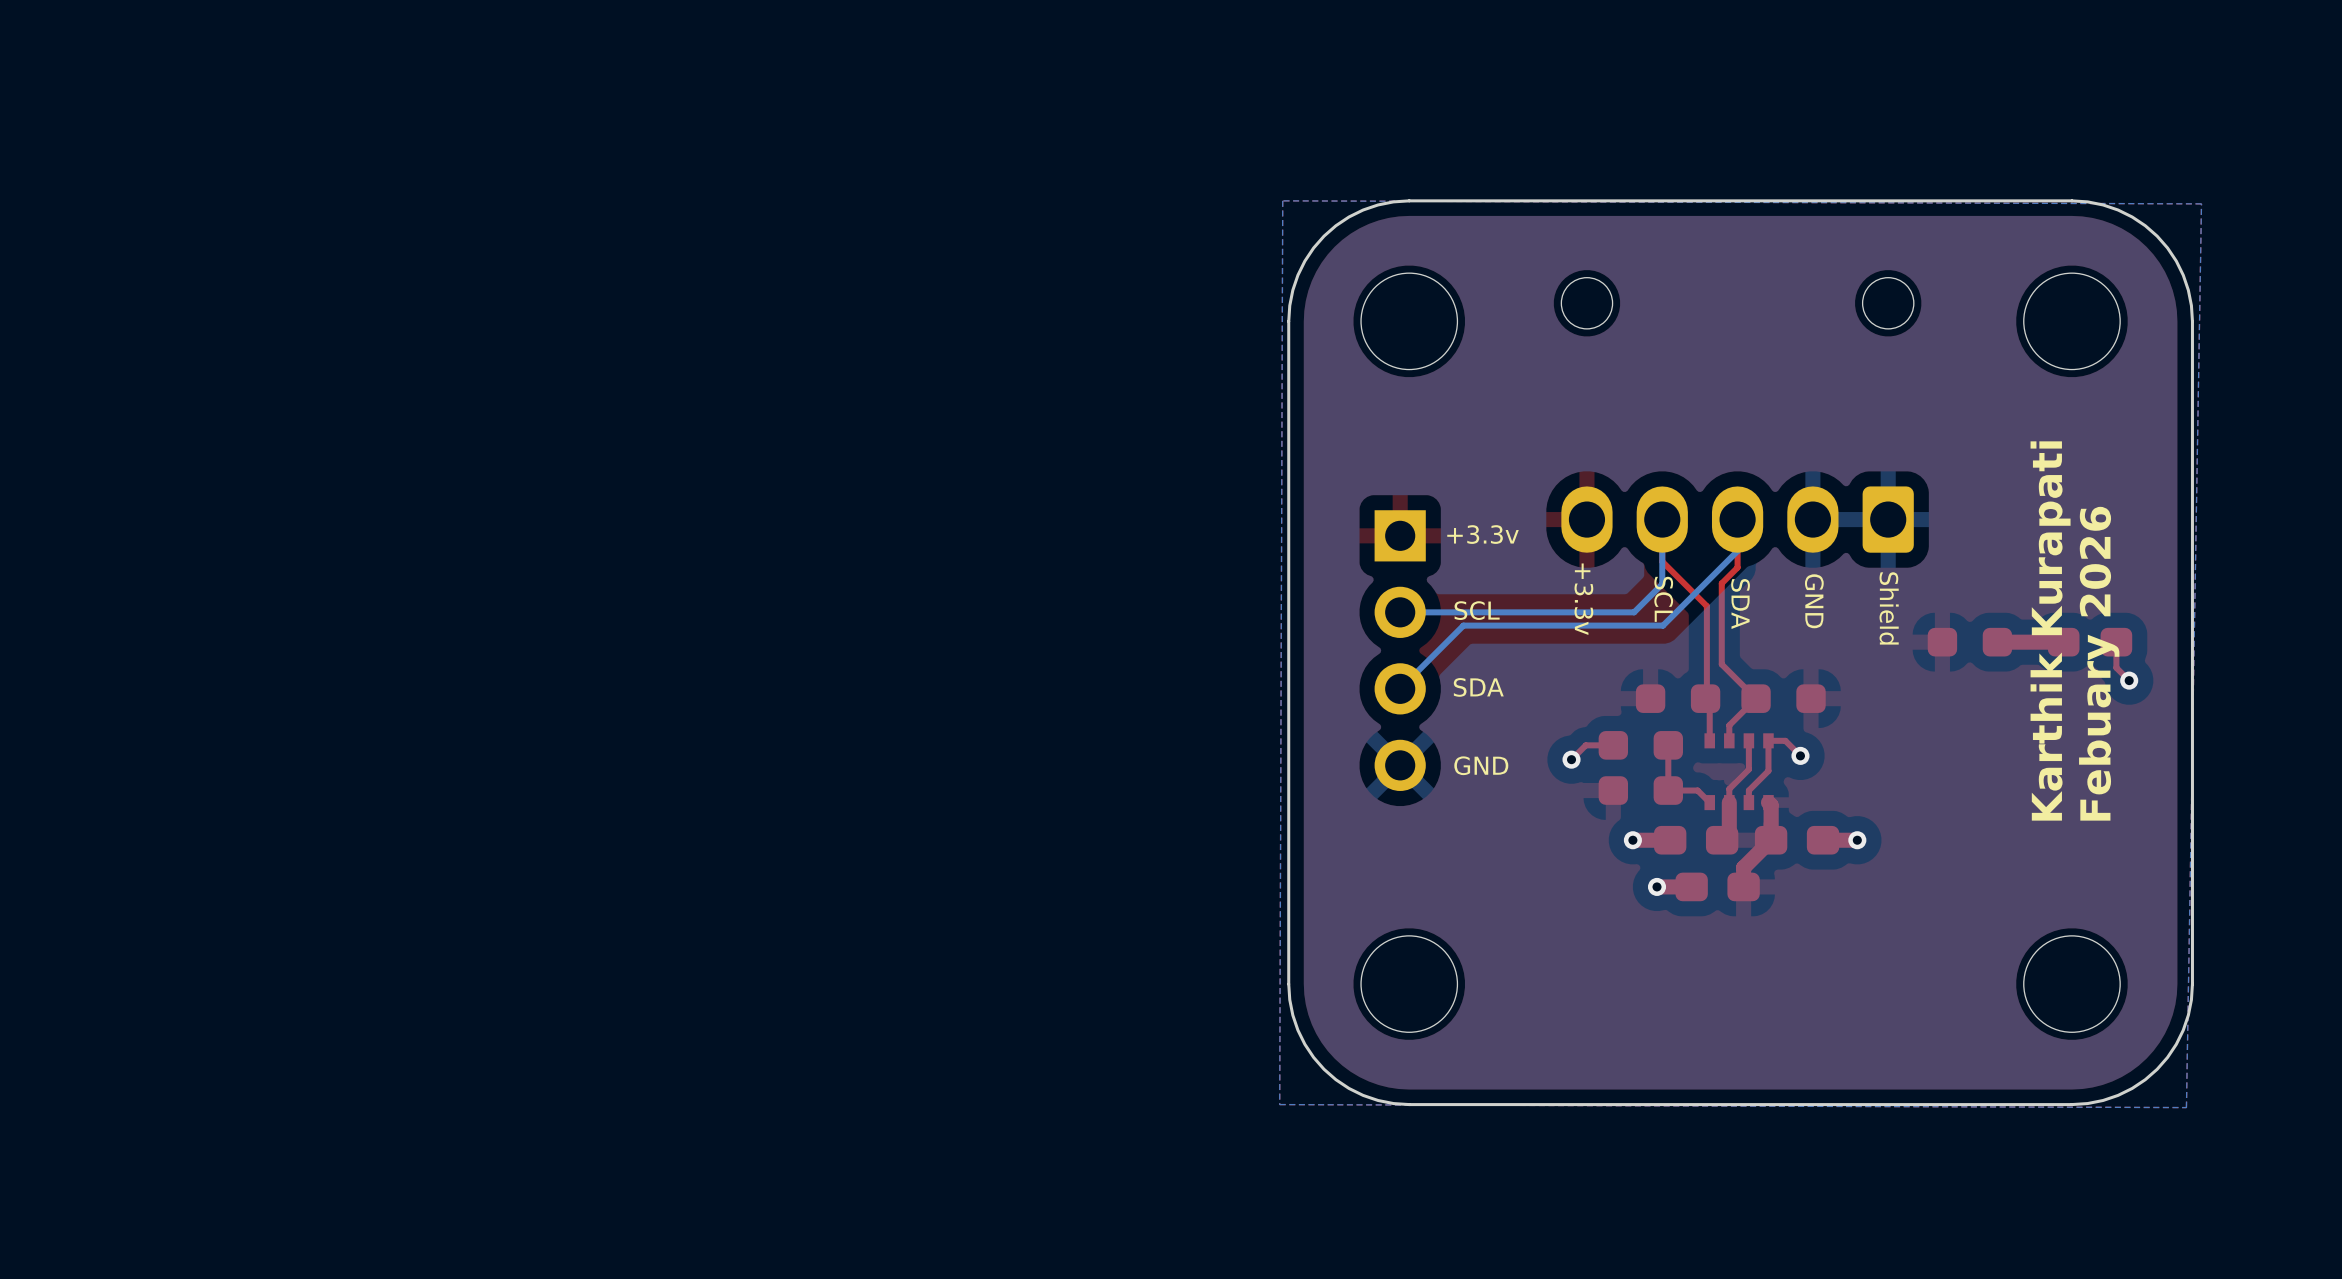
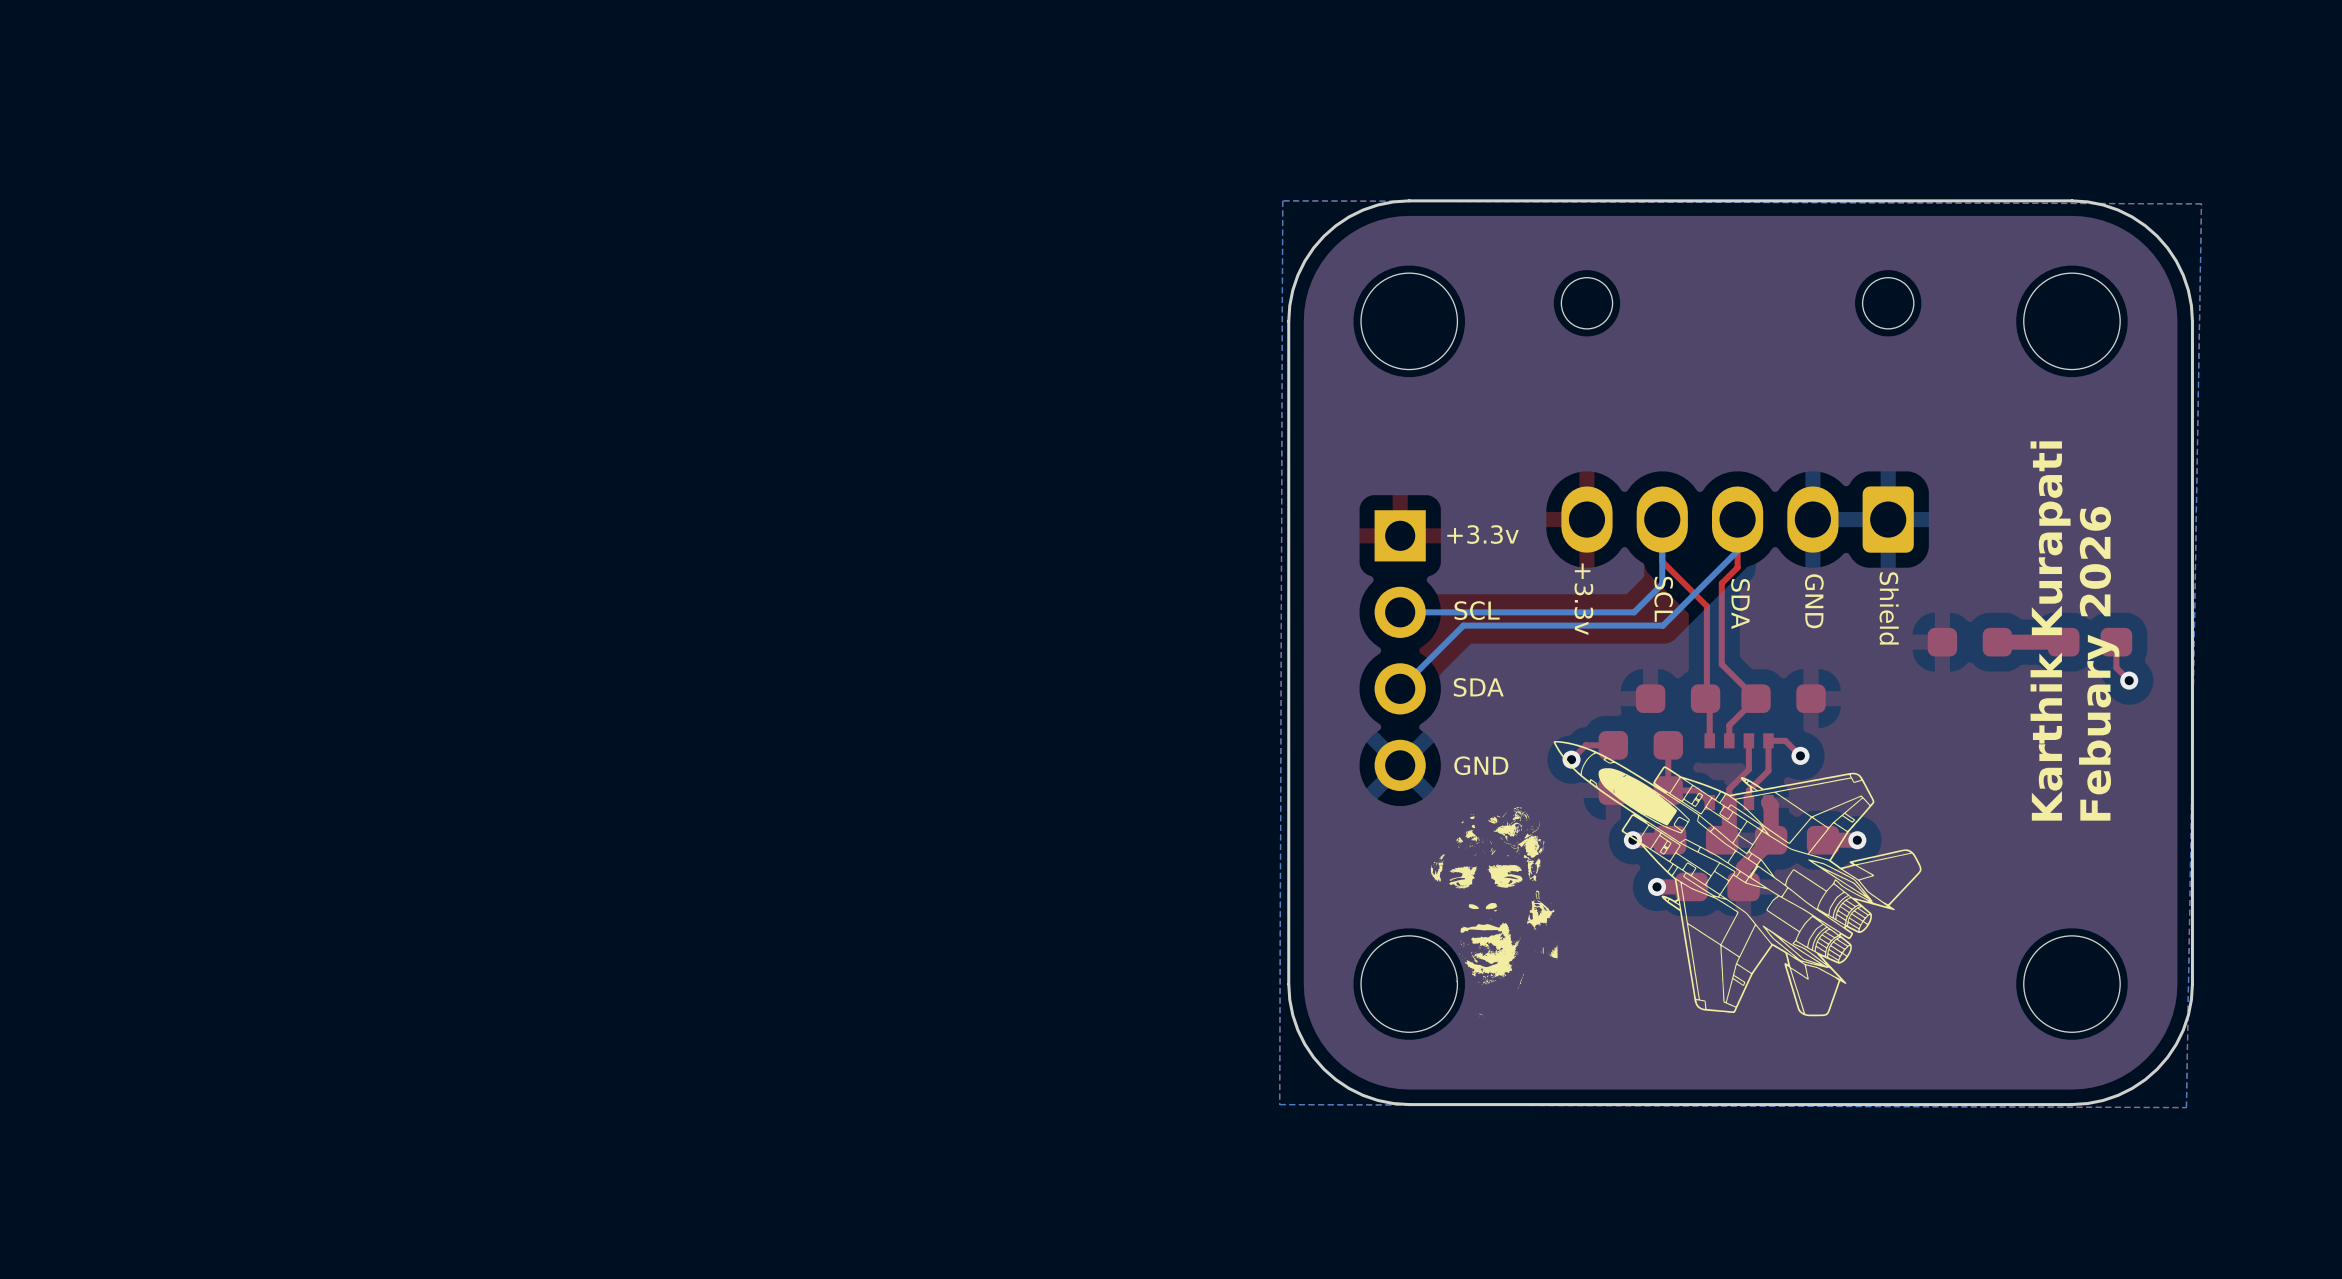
drawing: none -> [1430, 741, 1922, 1018]

